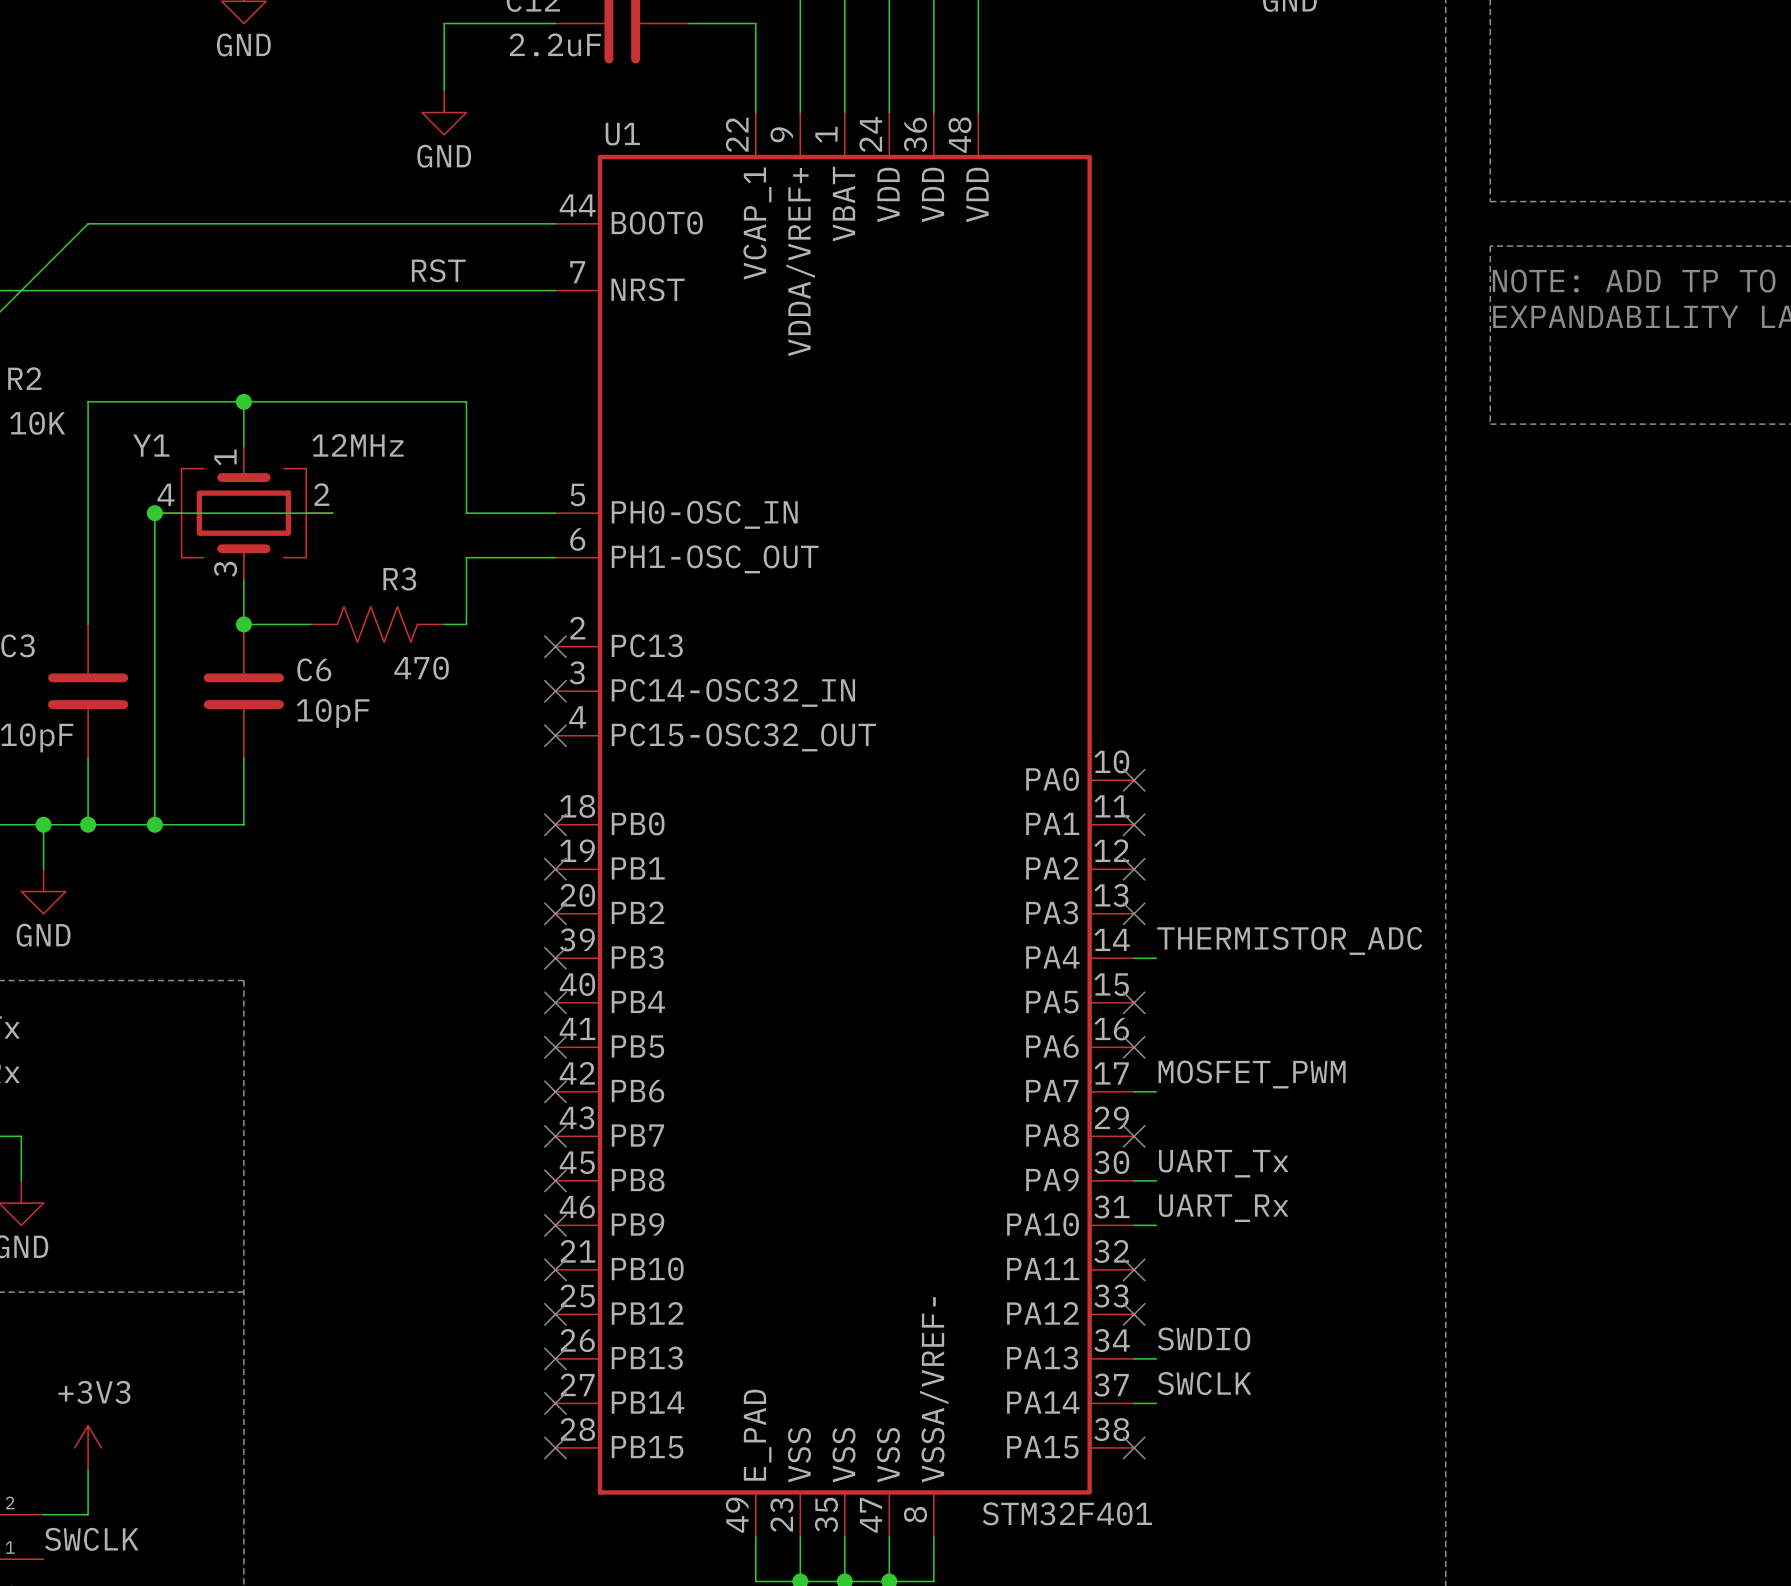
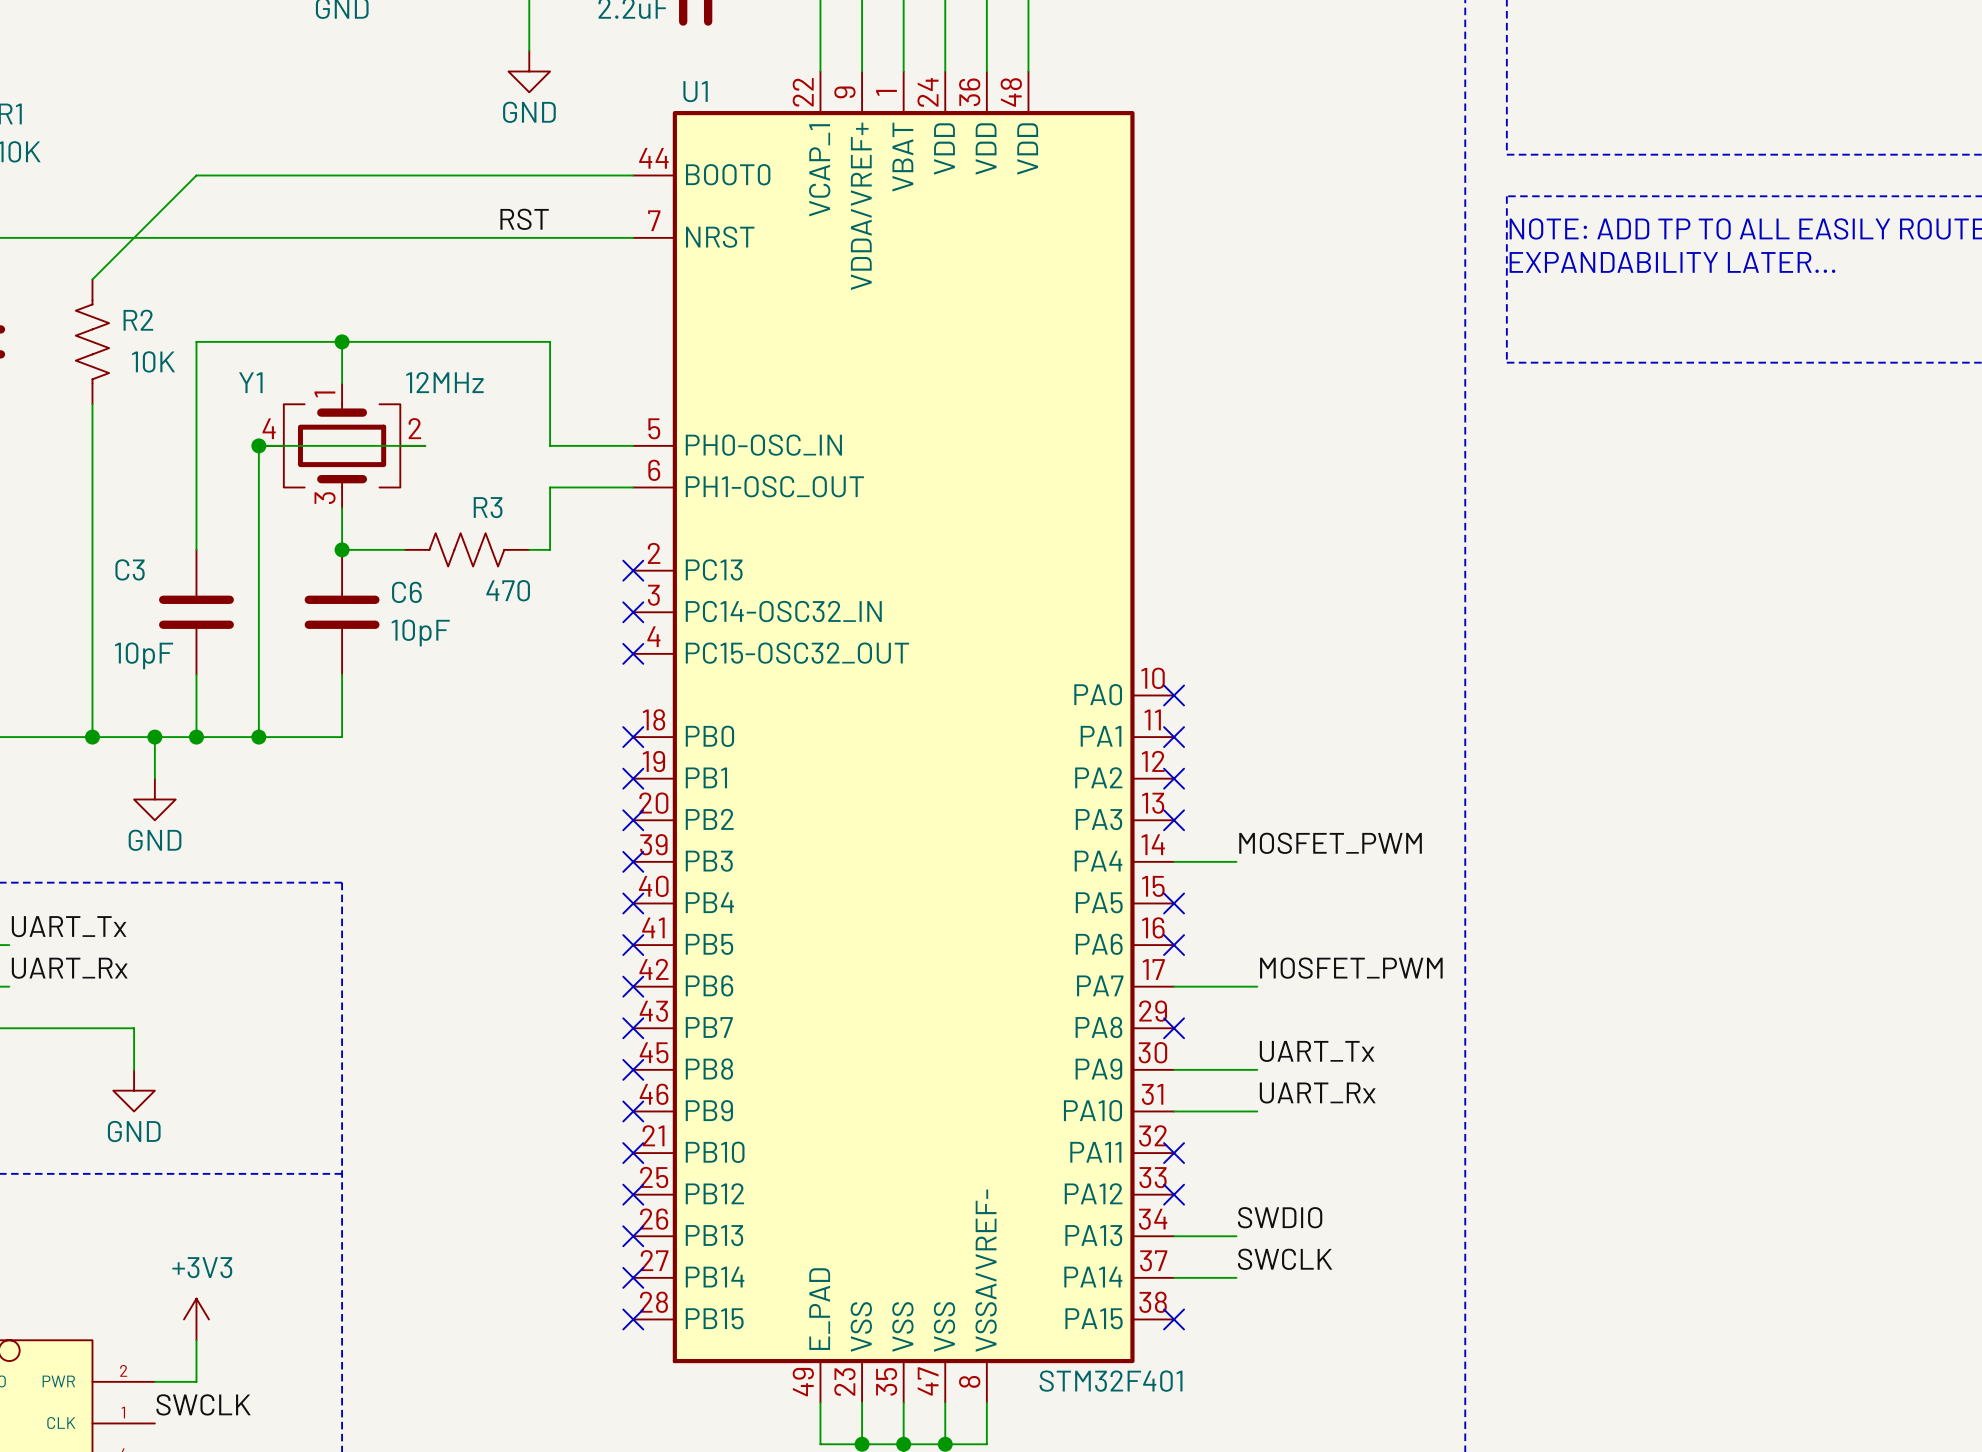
label: THERMISTOR_ADC (1289, 940) -> none
label: none -> MOSFET_PWM (1330, 843)
wire: none -> (1194, 861) (1236, 861)
label position: MOSFET_PWM (1252, 1074) -> MOSFET_PWM (1351, 968)
wire: none -> (1194, 986) (1257, 986)
label position: UART_Tx (1223, 1163) -> UART_Tx (1317, 1051)
wire: none -> (1194, 1069) (1257, 1069)
label position: UART_Rx (1223, 1208) -> UART_Rx (1317, 1093)
wire: none -> (1194, 1111) (1257, 1111)
label position: SWDIO (1204, 1339) -> SWDIO (1280, 1217)
wire: none -> (1194, 1236) (1236, 1236)
label position: SWCLK (1204, 1383) -> SWCLK (1285, 1259)
wire: none -> (1194, 1277) (1236, 1277)

